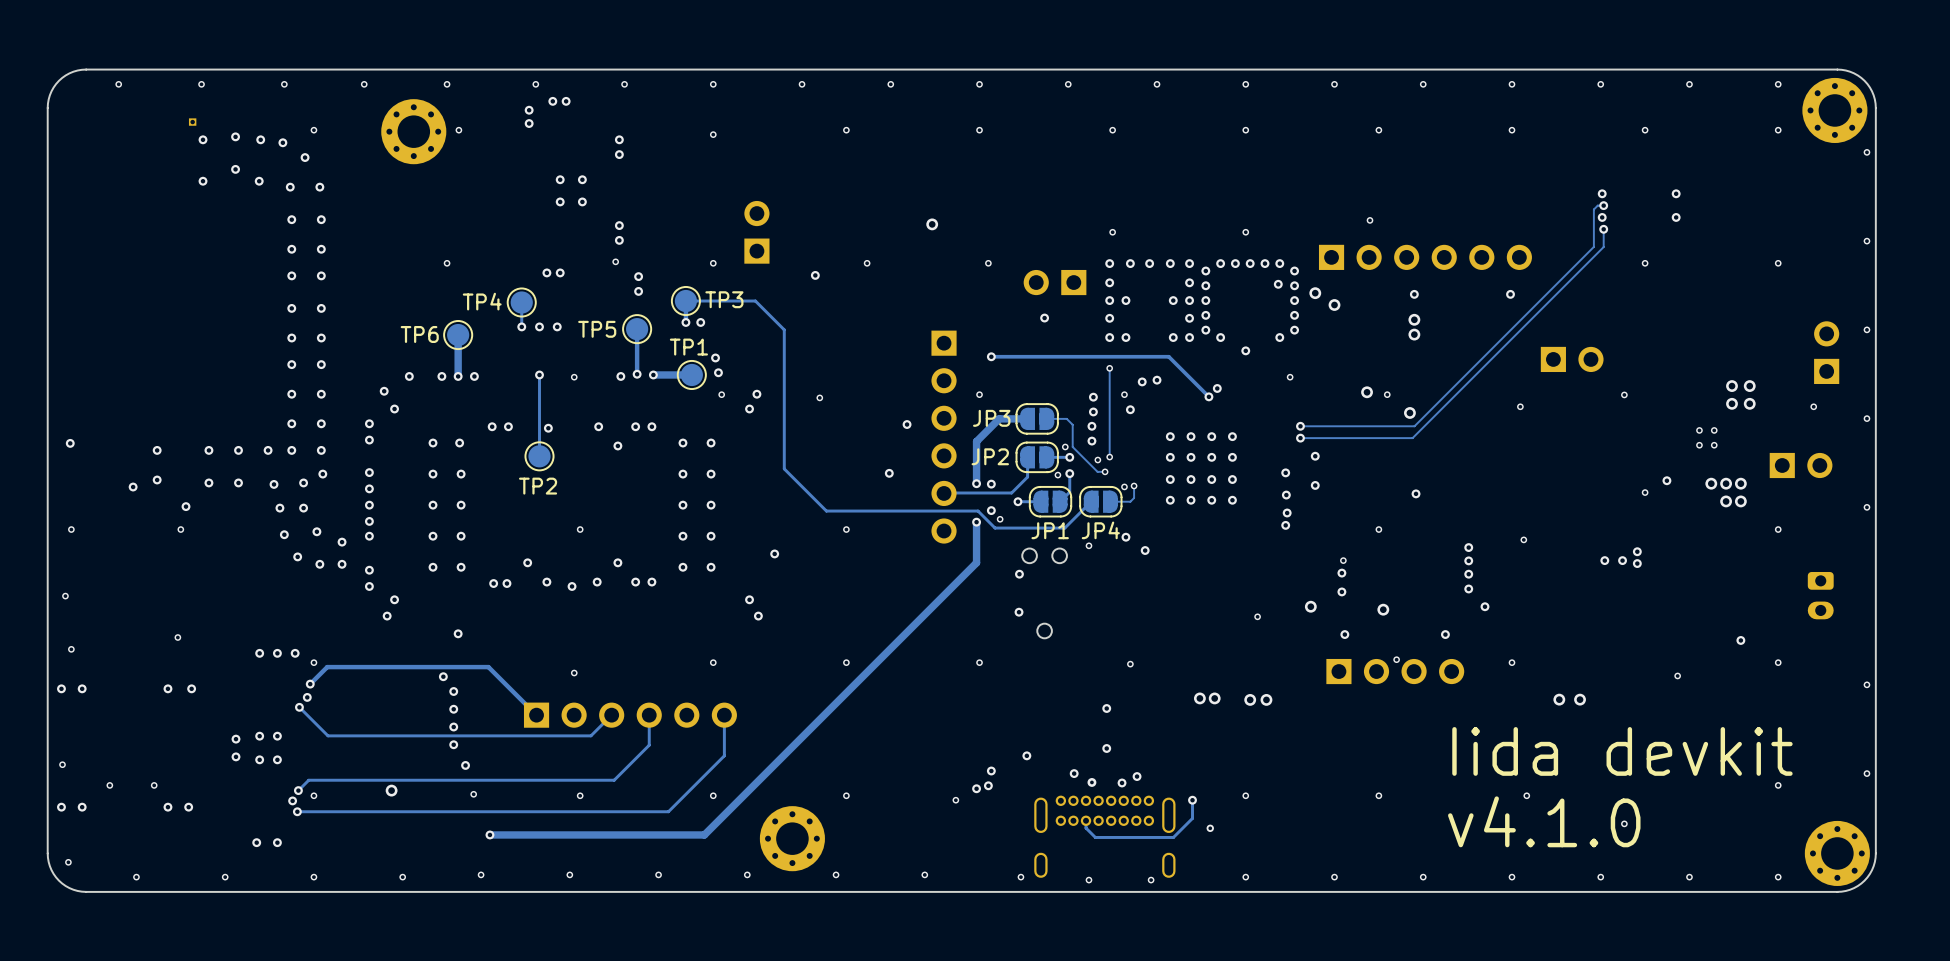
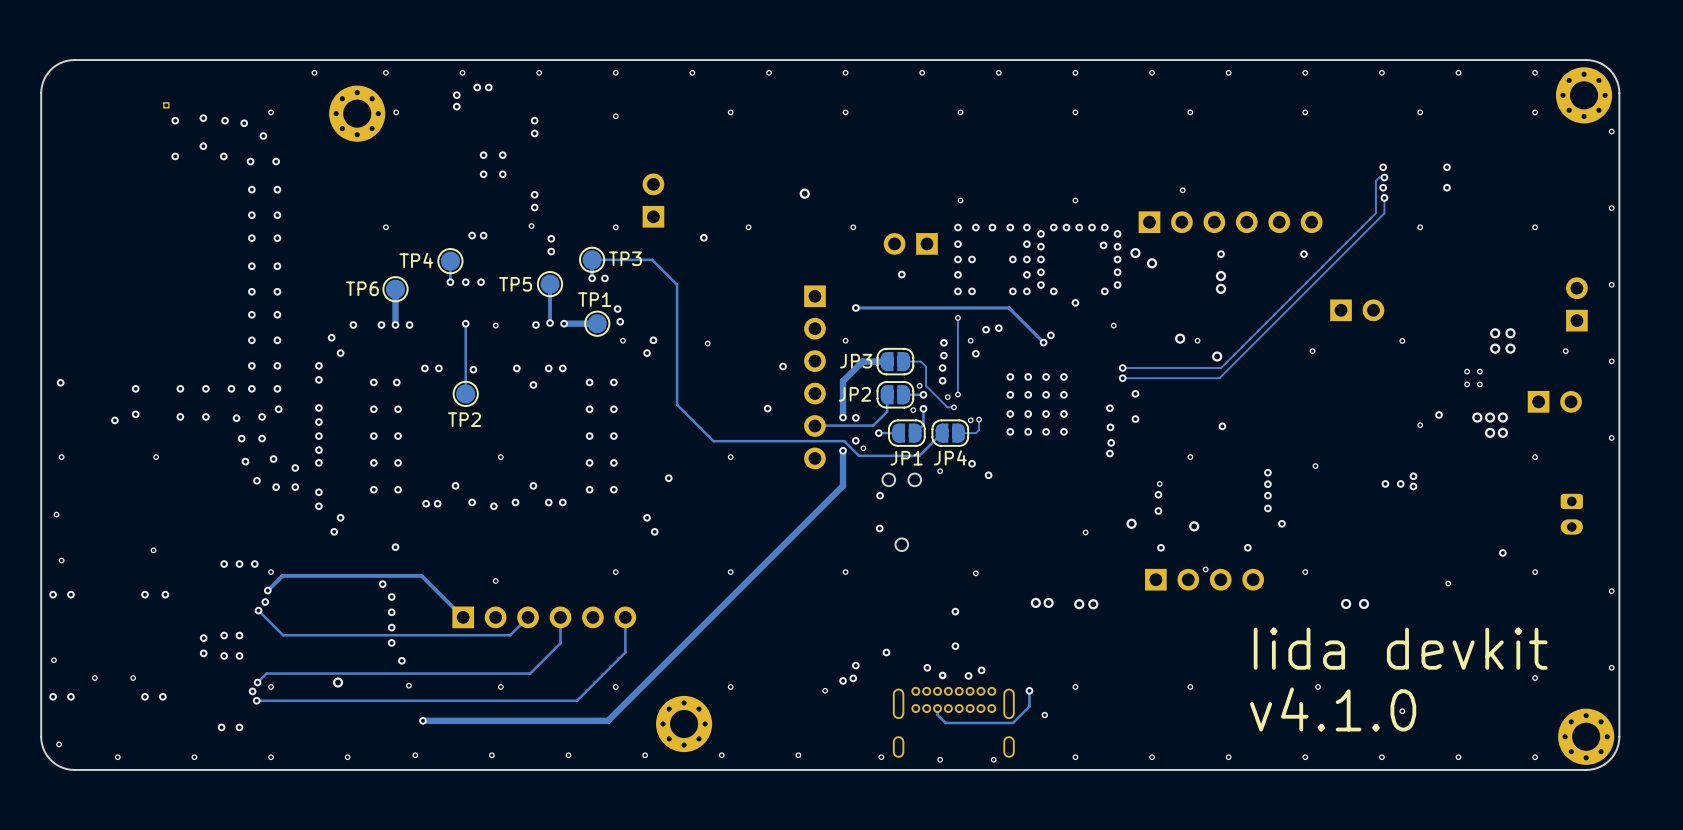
via: (118, 84) -> none
via: (201, 84) -> none
via: (284, 84) -> none
via: (186, 506) -> none

